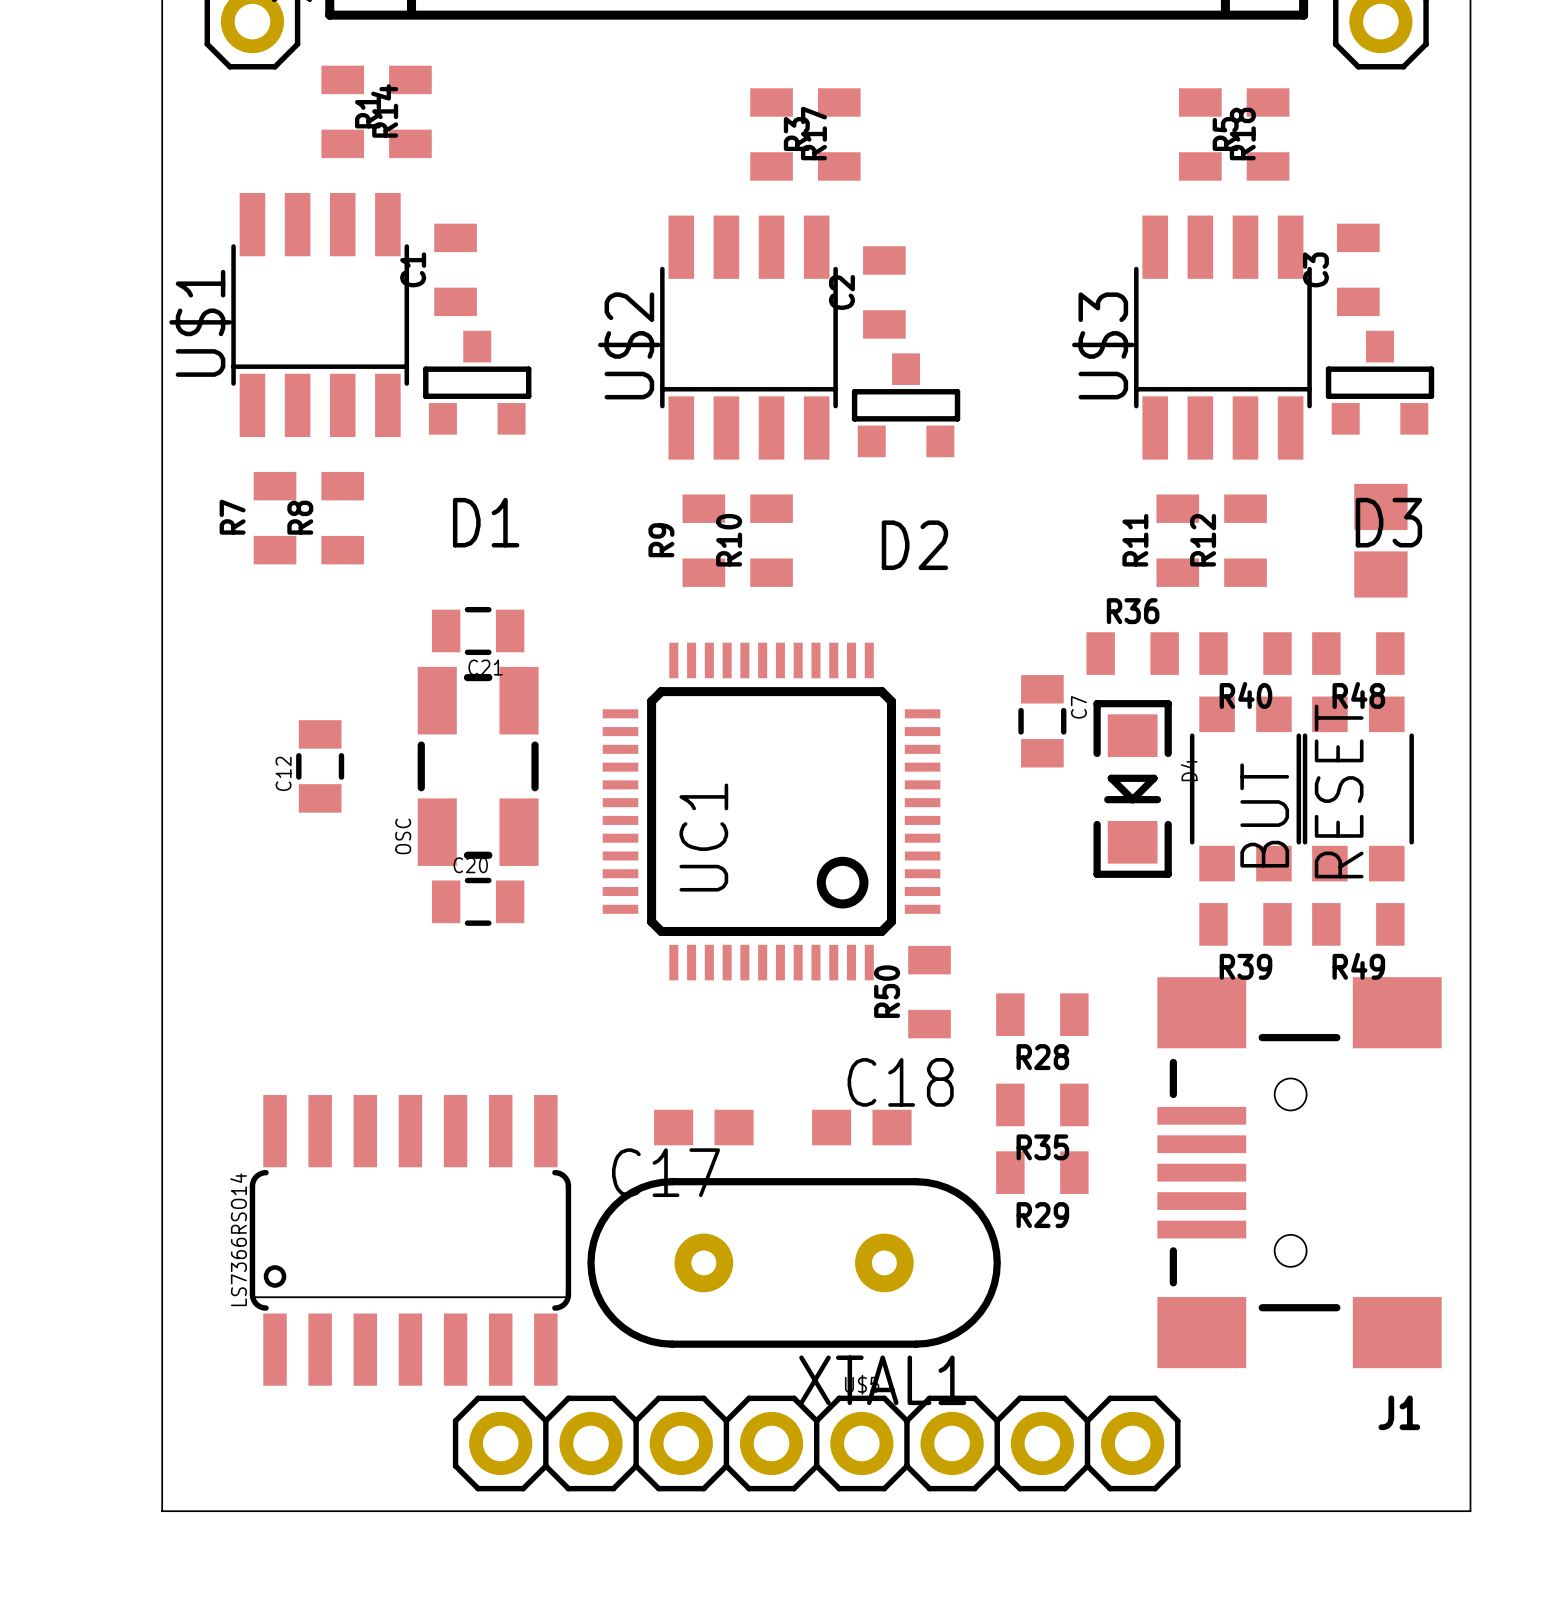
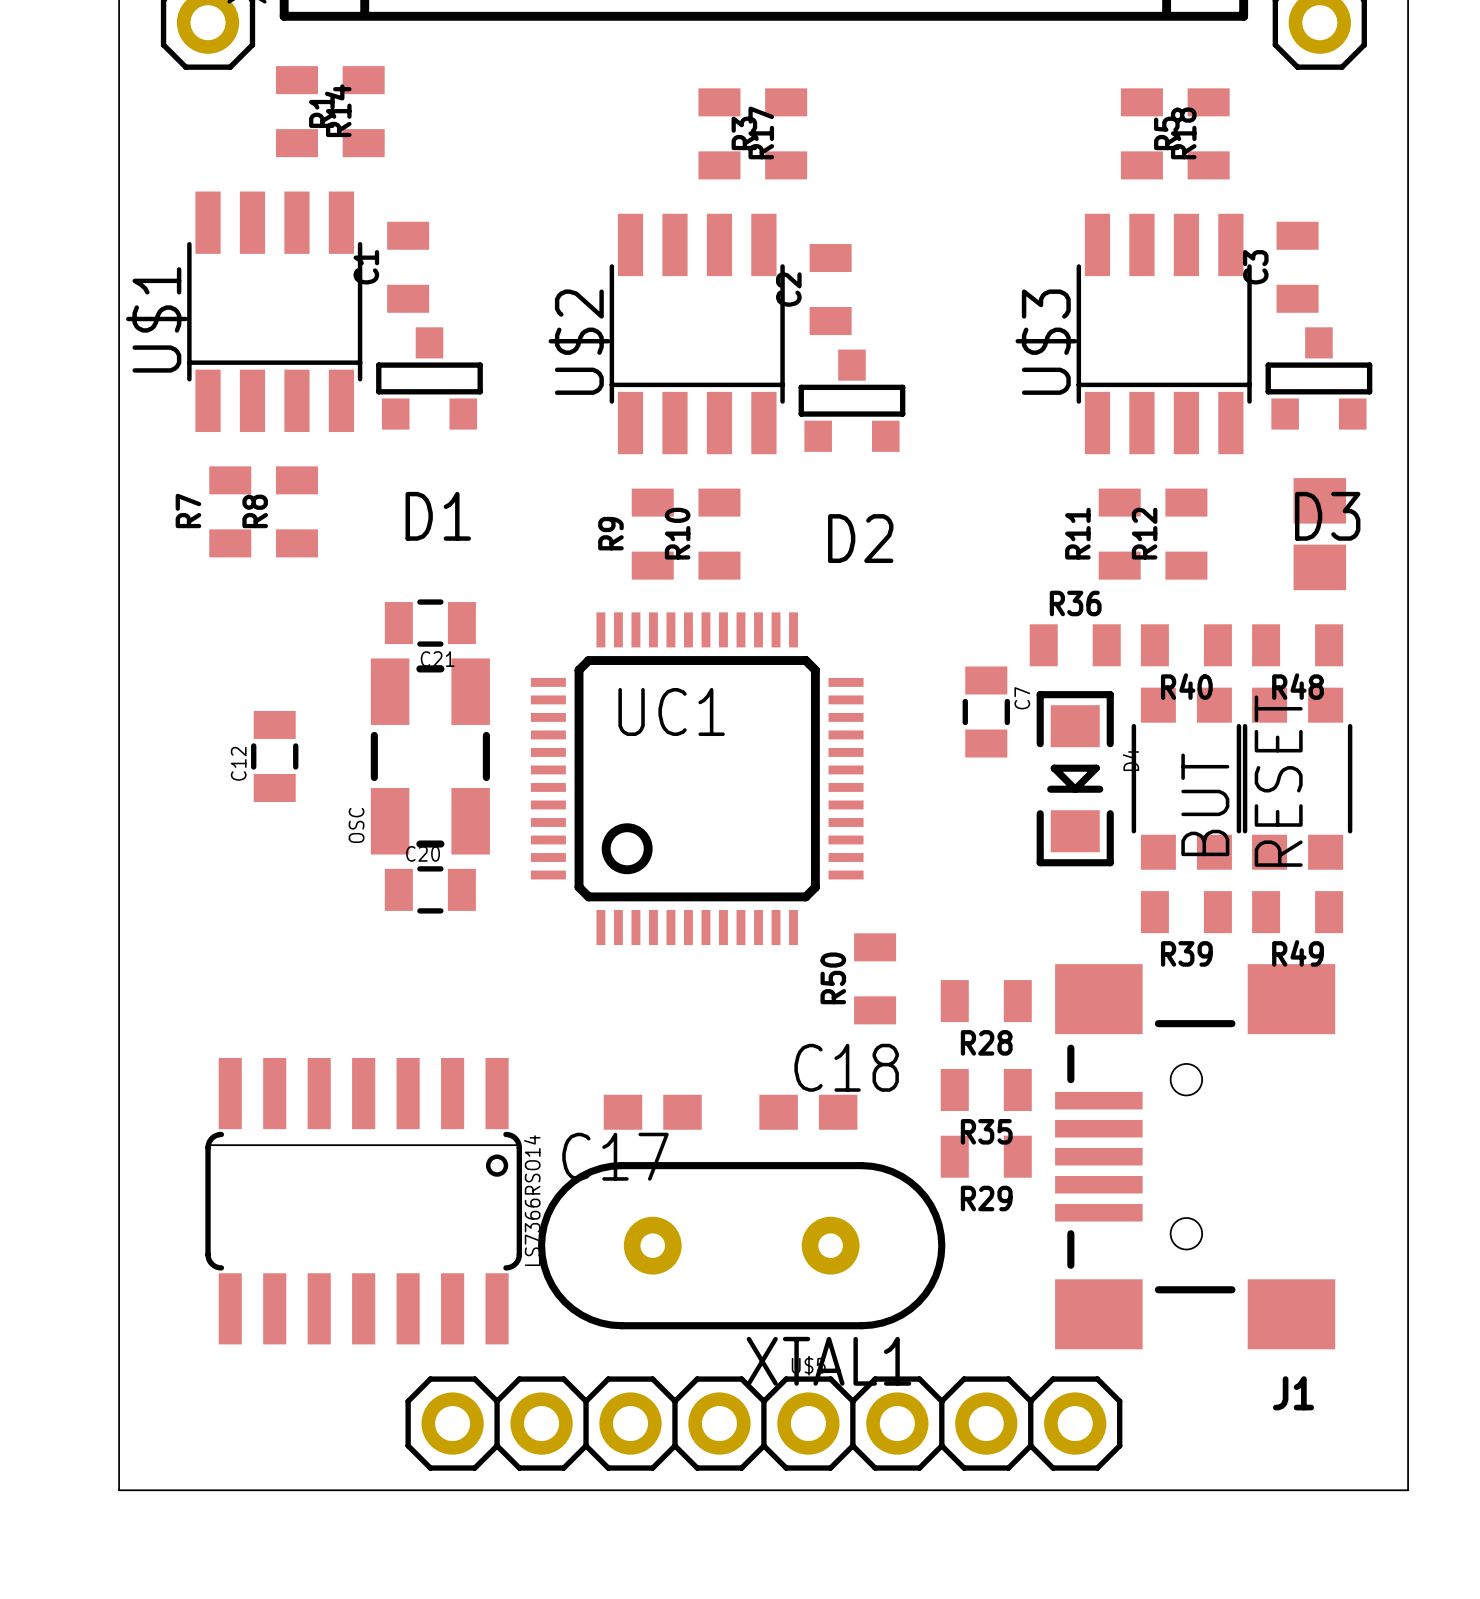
UC1 rotation: 0° (771, 811) -> 90° clockwise (697, 778)
J1 position: (1299, 1172) -> (1195, 1156)
part rotation: 0° (410, 1240) -> 180° (363, 1201)

